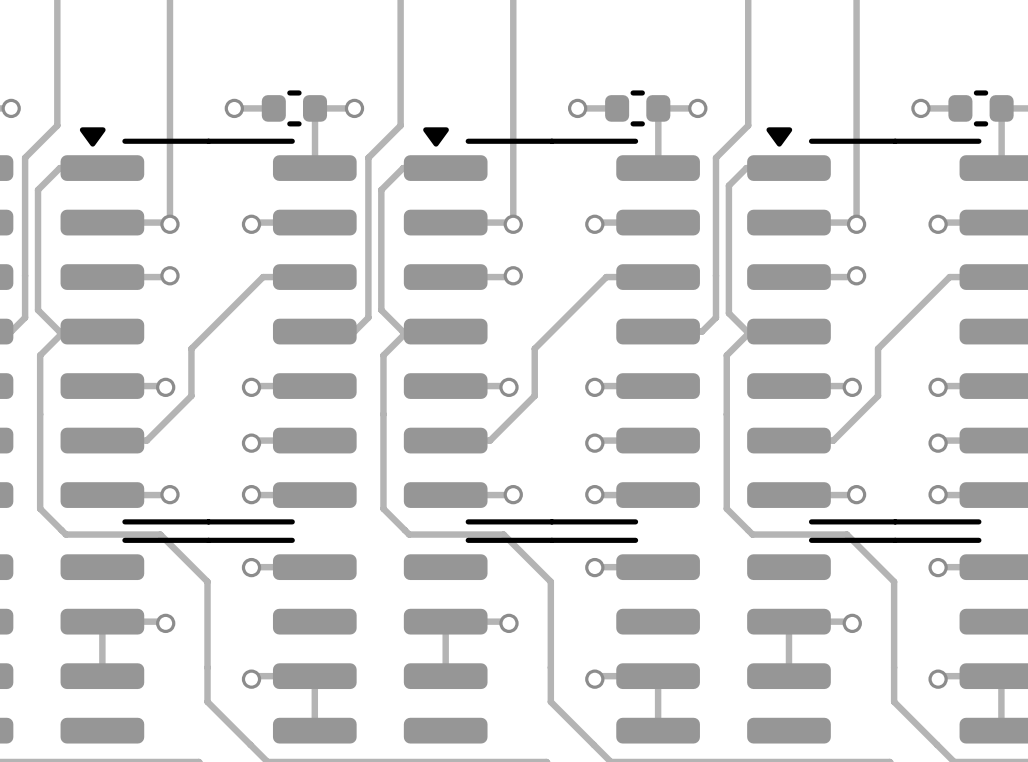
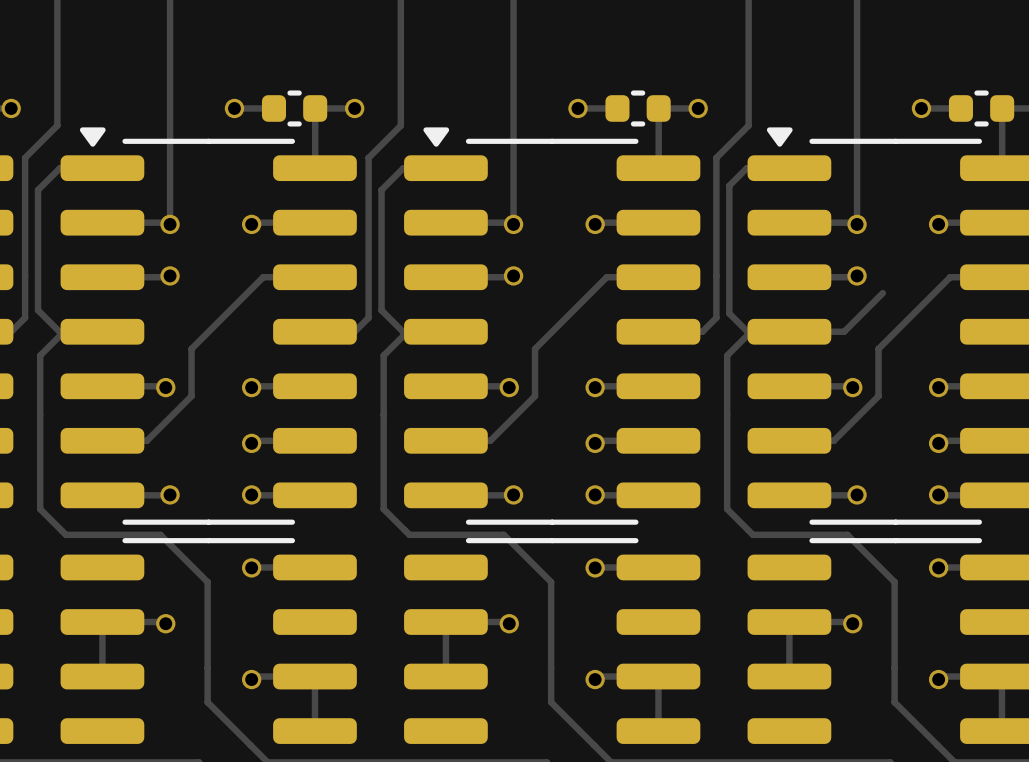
track: none -> (882, 293) (844, 331) (789, 331)

